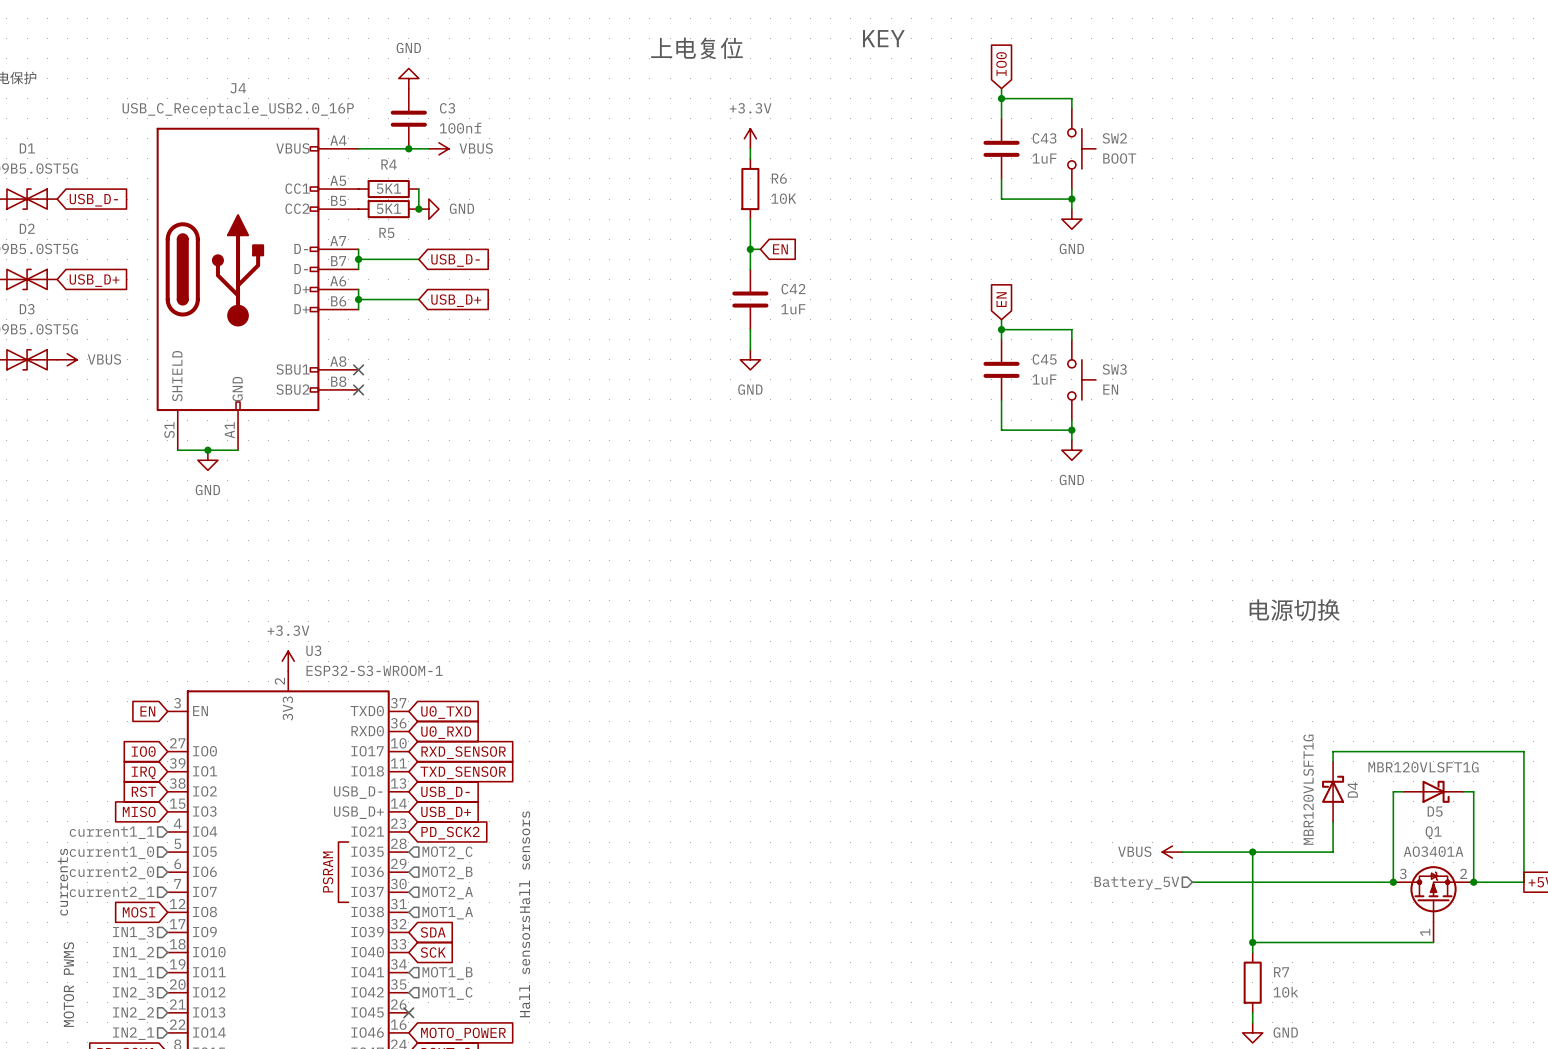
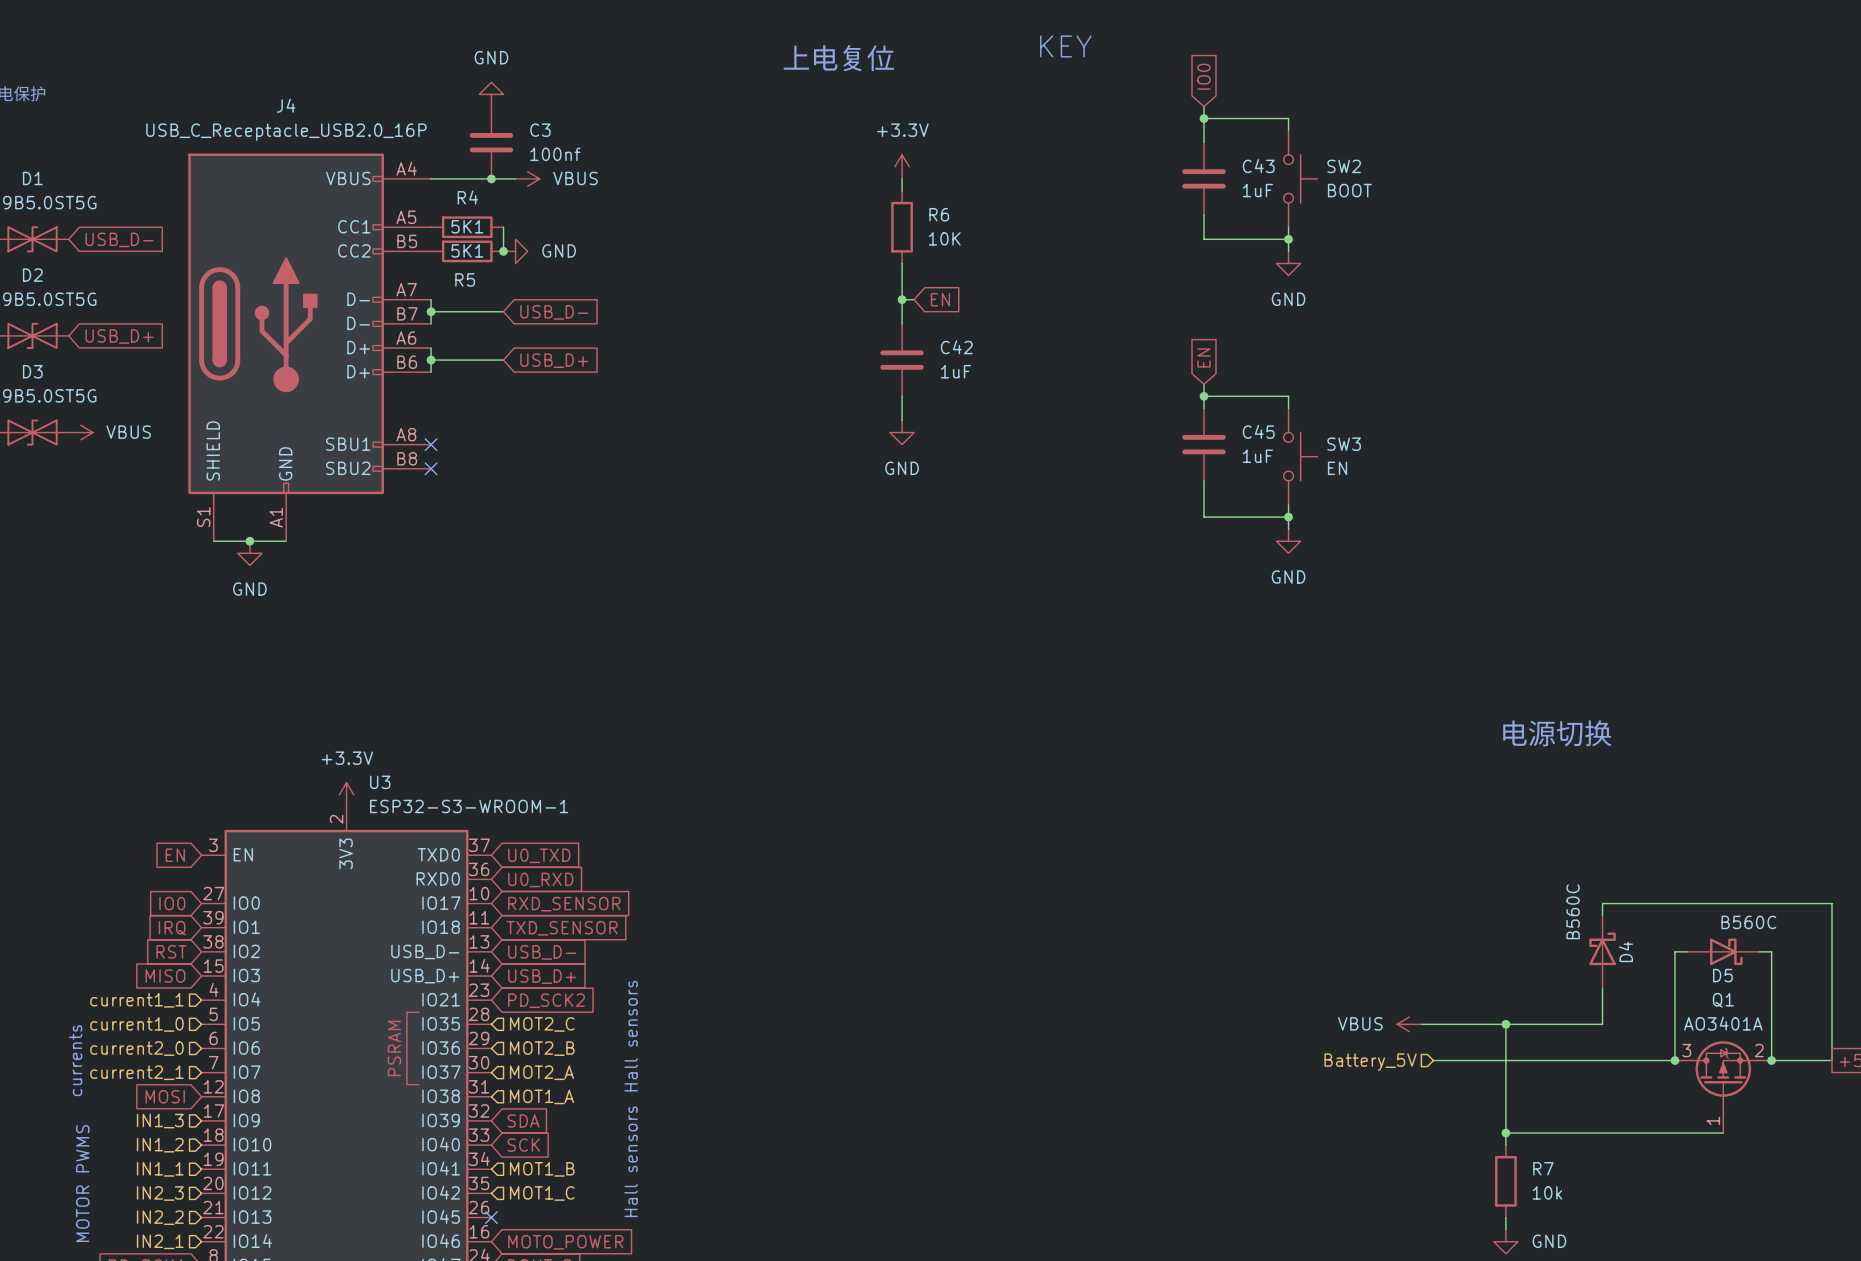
D5 value: MBR120VLSFT1G (1423, 767) -> B560C (1748, 922)
D4 value: MBR120VLSFT1G (1308, 789) -> B560C (1573, 911)

